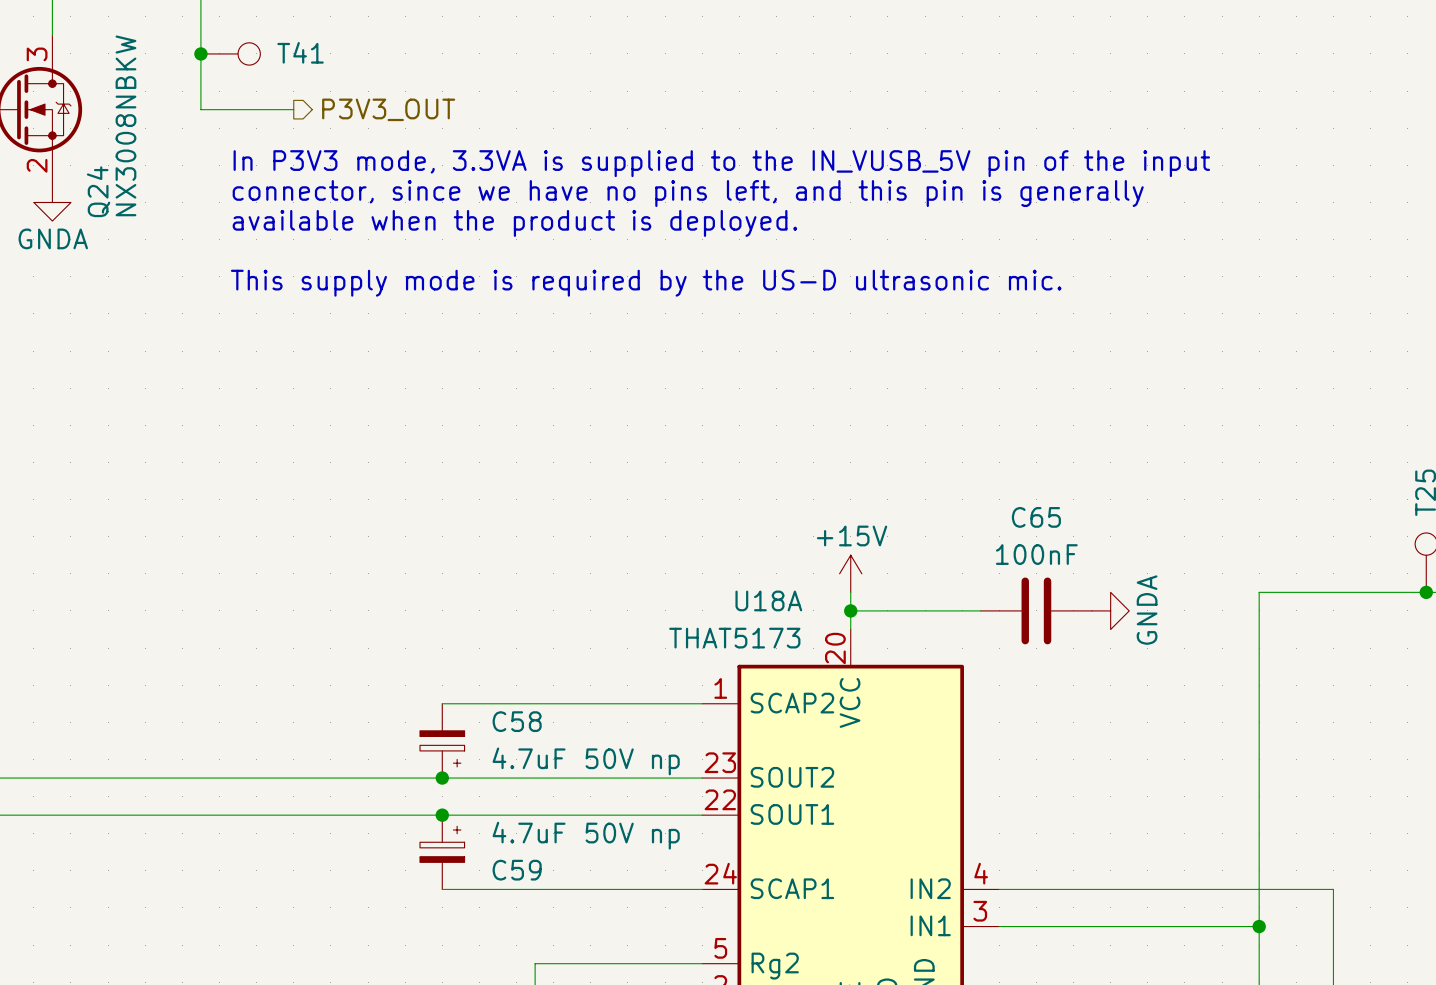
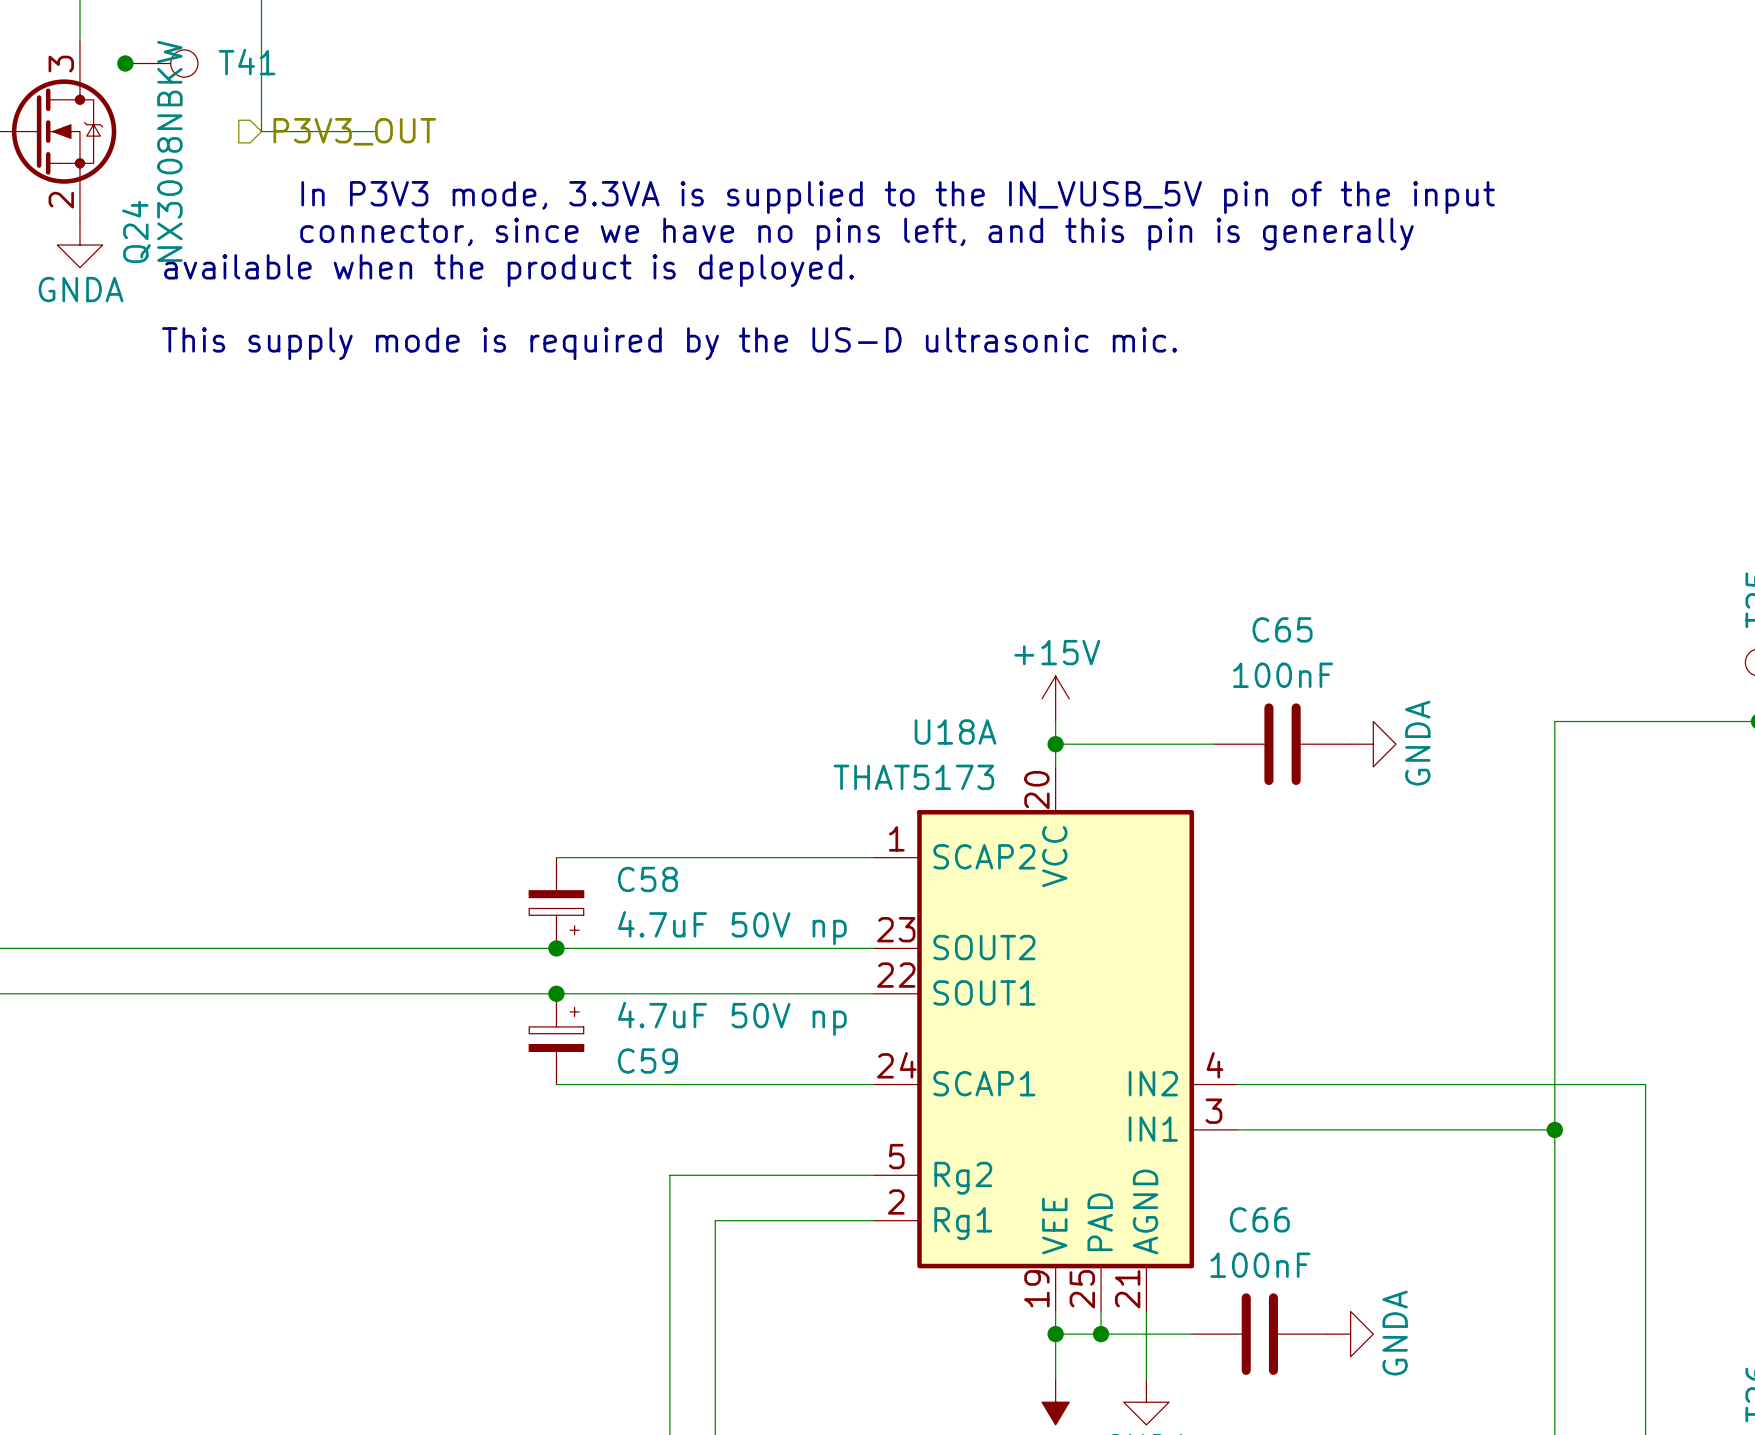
junction: none -> (125, 63)
junction: (200, 53) -> none
T41 position: (230, 53) -> (161, 63)
hierarchical label position: P3V3_OUT (388, 109) -> P3V3_OUT (354, 131)
text position: available when the product is deployed. (514, 223) -> available when the product is deployed. (509, 270)
text position: This supply mode is required by the US-D ultrasonic mic. (646, 283) -> This supply mode is required by the US-D ultrasonic mic. (669, 343)

